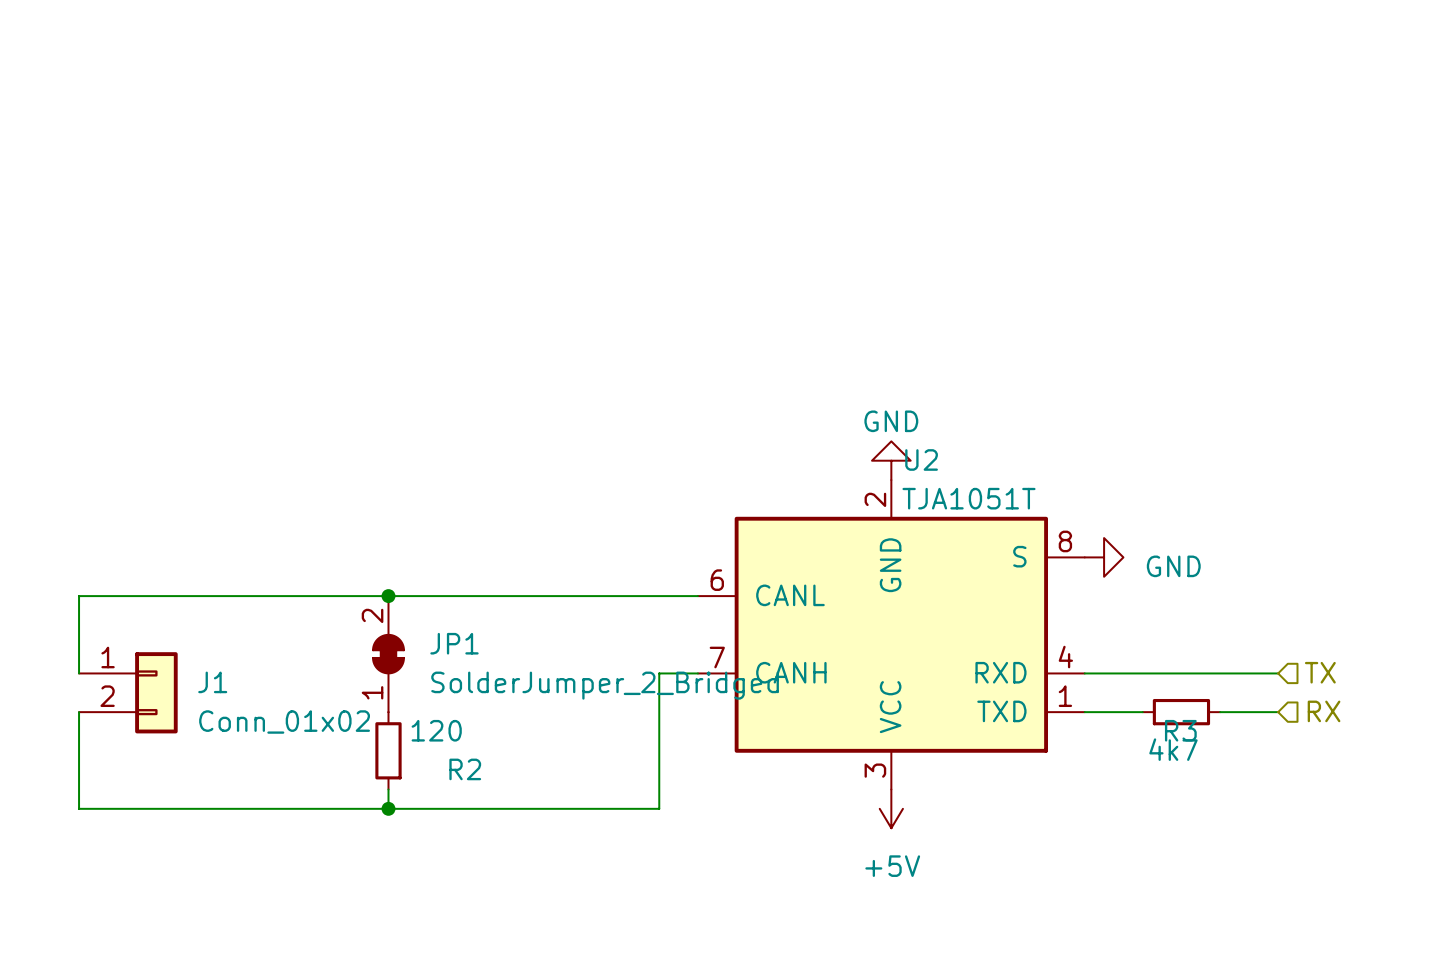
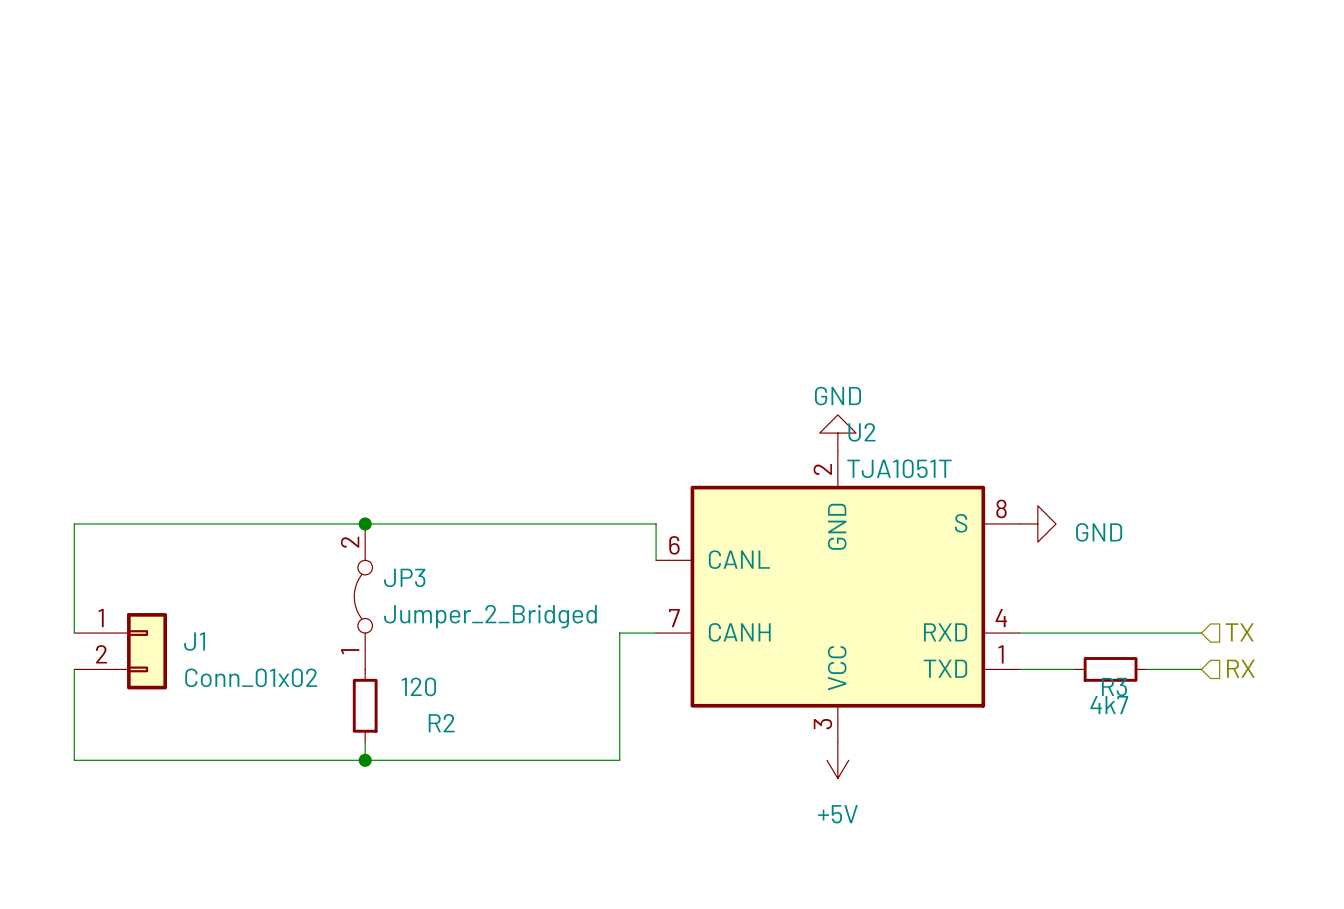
wire: (79, 596) (697, 596) -> (74, 560) (74, 523) (656, 523) (656, 560)
junction position: (388, 596) -> (365, 523)
JP3: none -> Jumper_2_Bridged (363, 596)
JP1: SolderJumper_2_Bridged (388, 654) -> none

